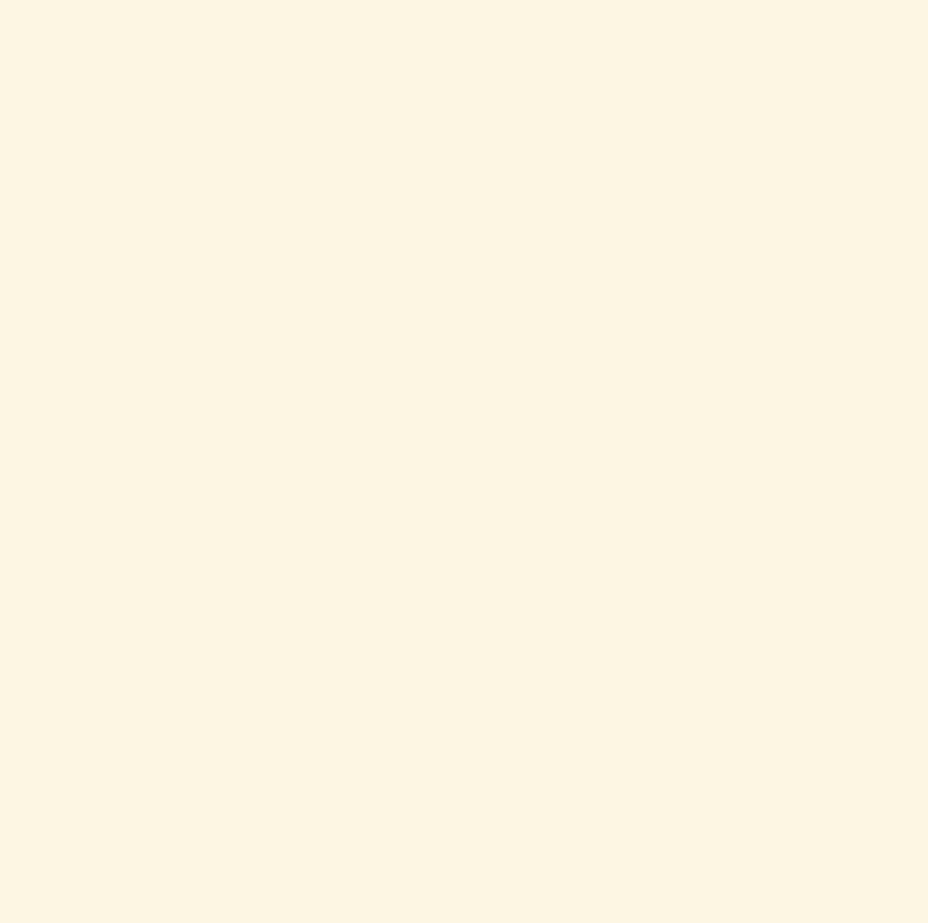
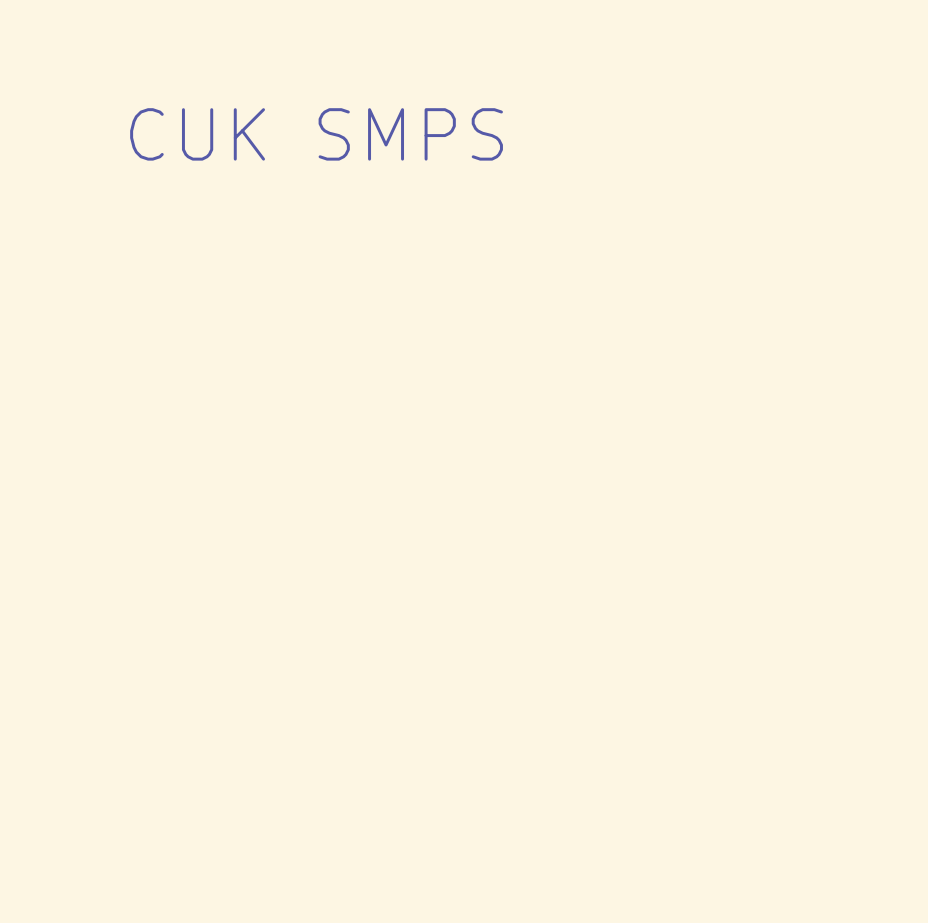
text: none -> CUK SMPS (316, 134)

